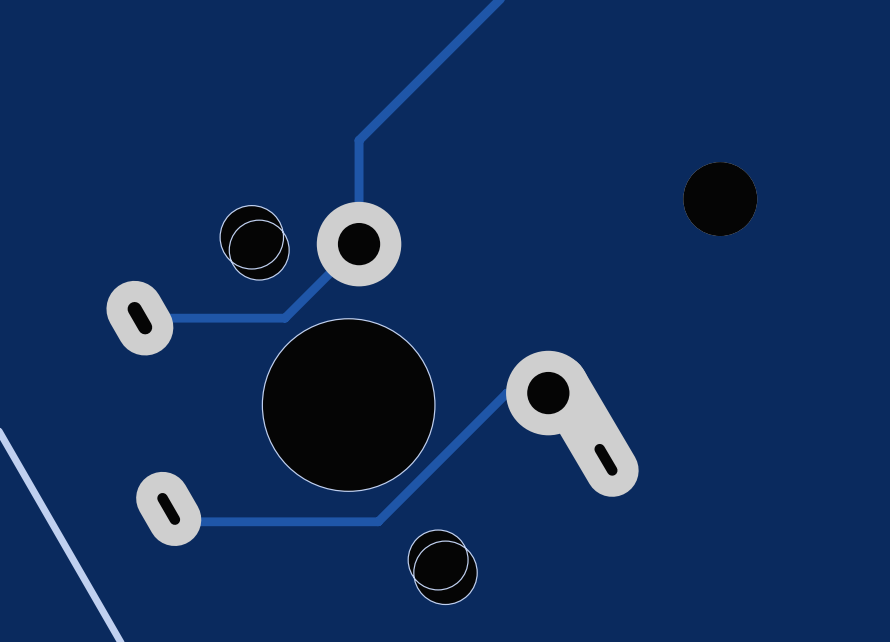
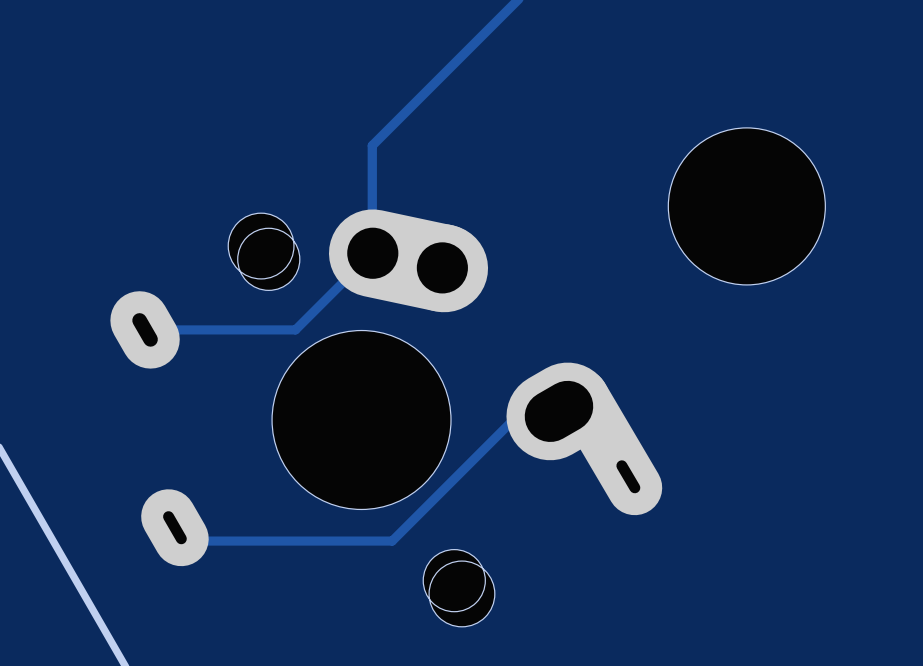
part footprint: [683, 162, 758, 237] -> [668, 127, 826, 285]
part footprint: [106, 201, 639, 605] -> [110, 209, 663, 627]

